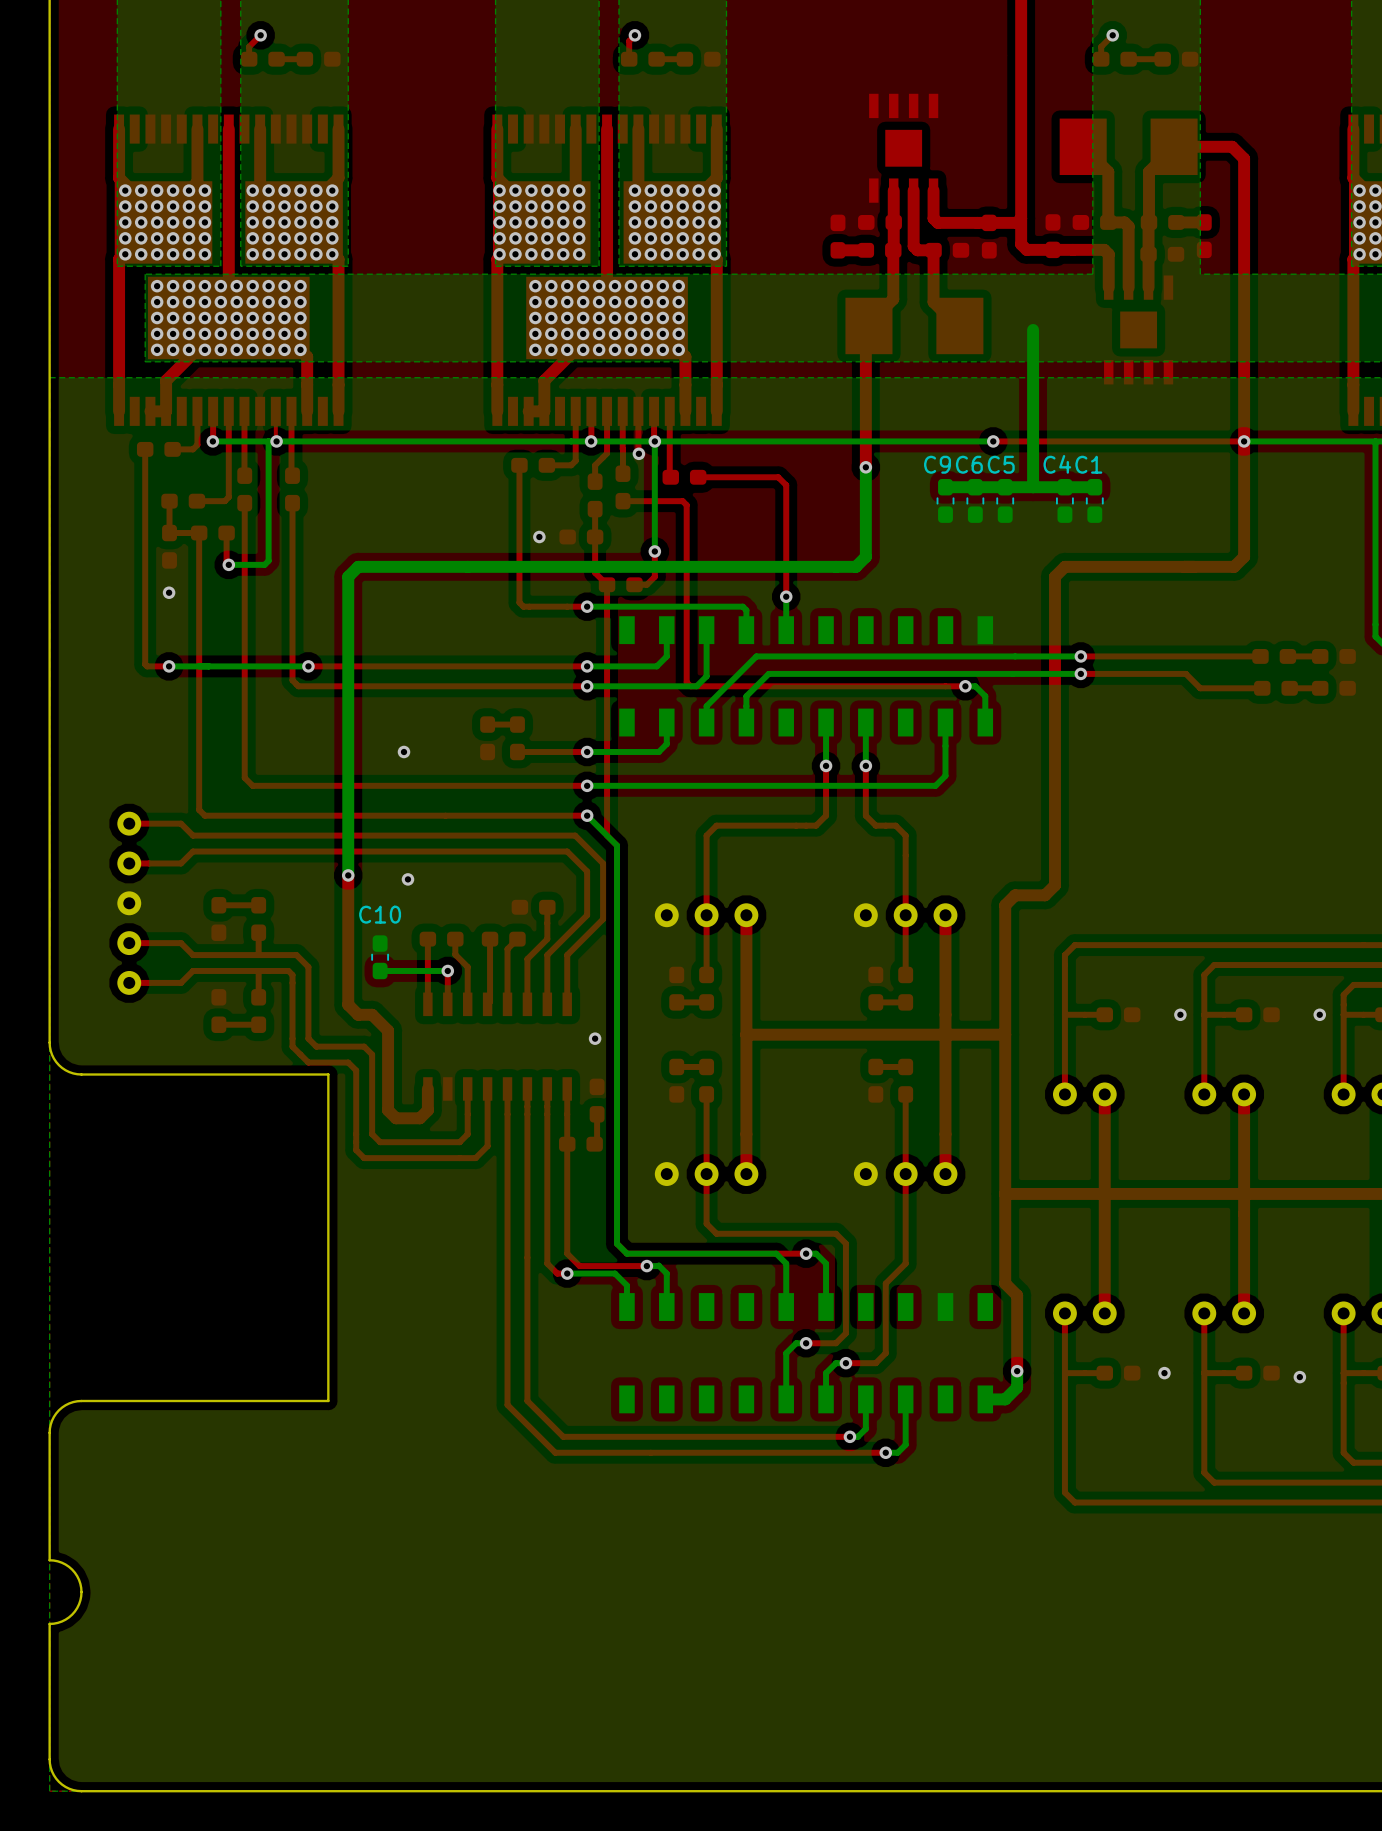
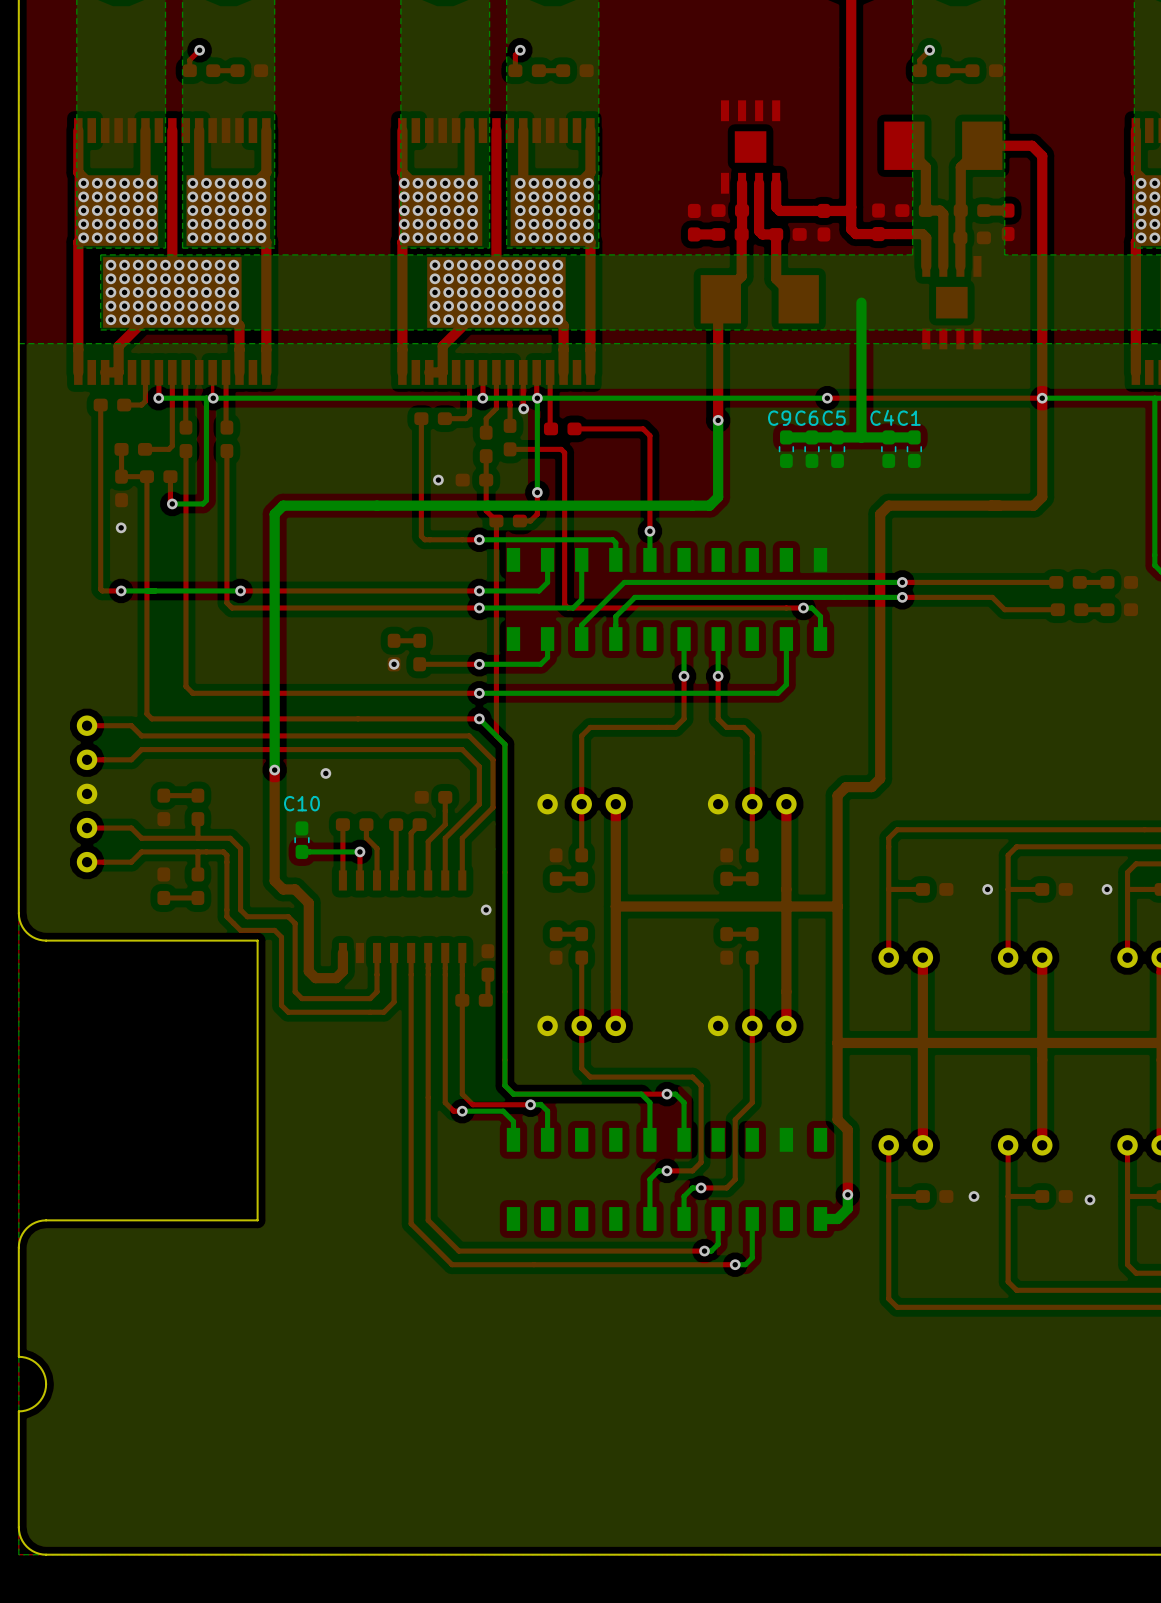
via position: (403, 751) -> (394, 664)

